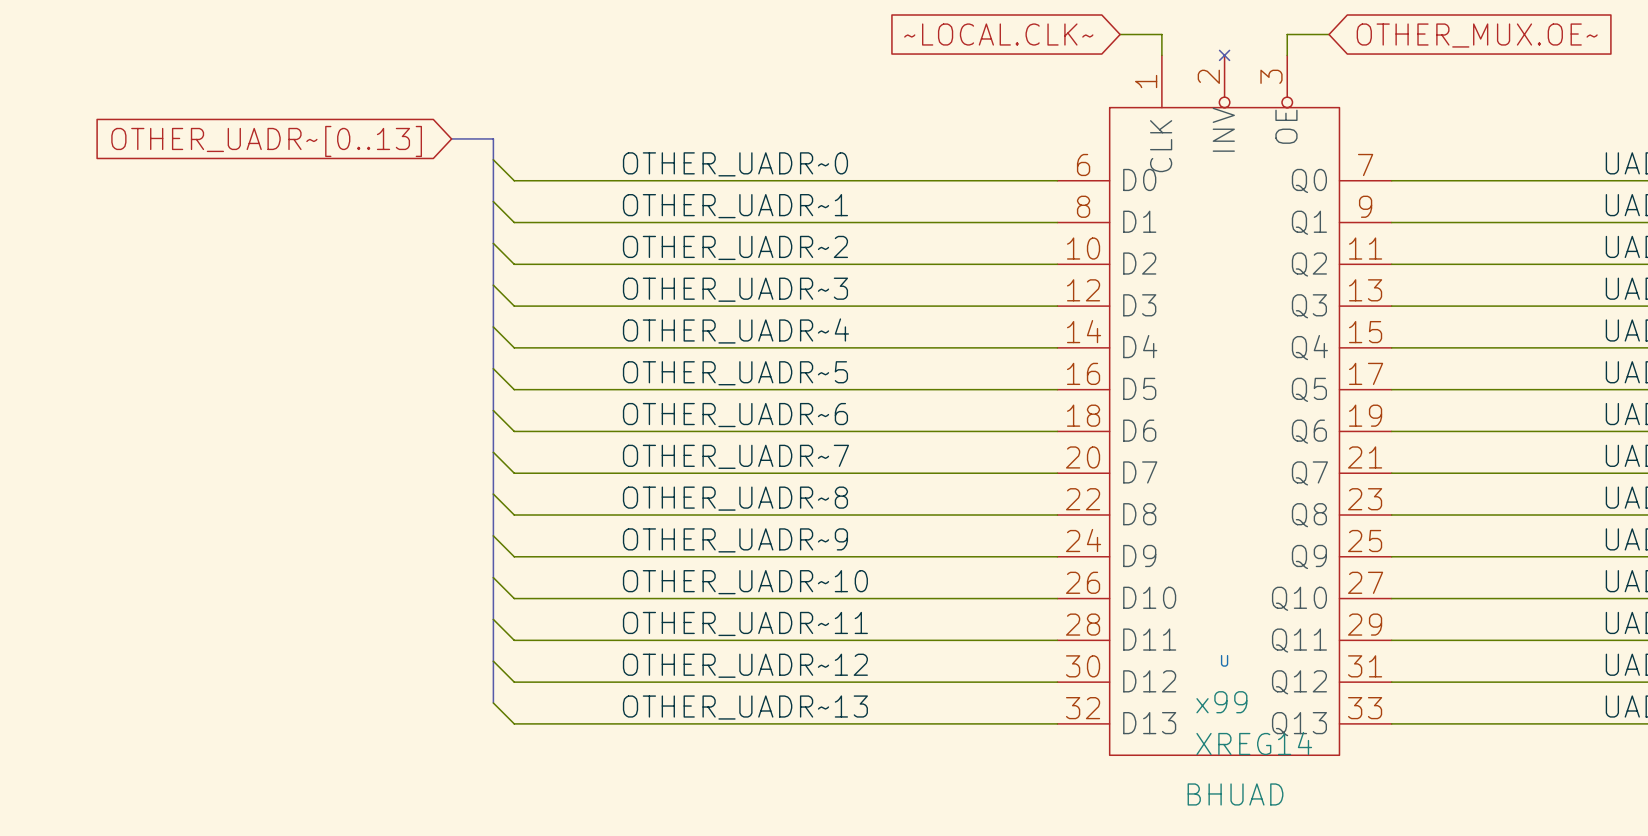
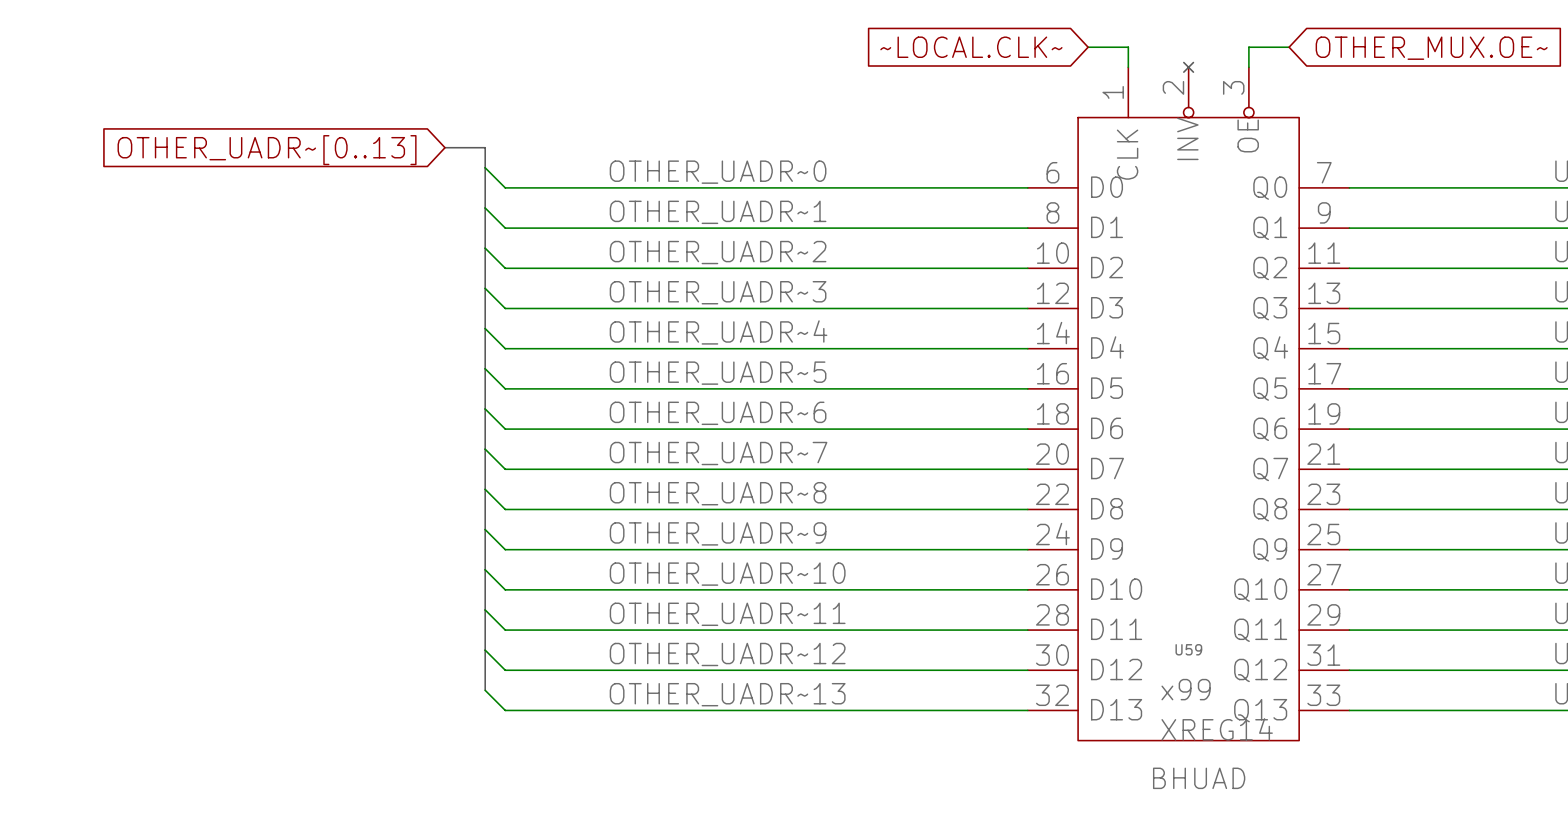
U name: U (1224, 660) -> U59 (1188, 649)

